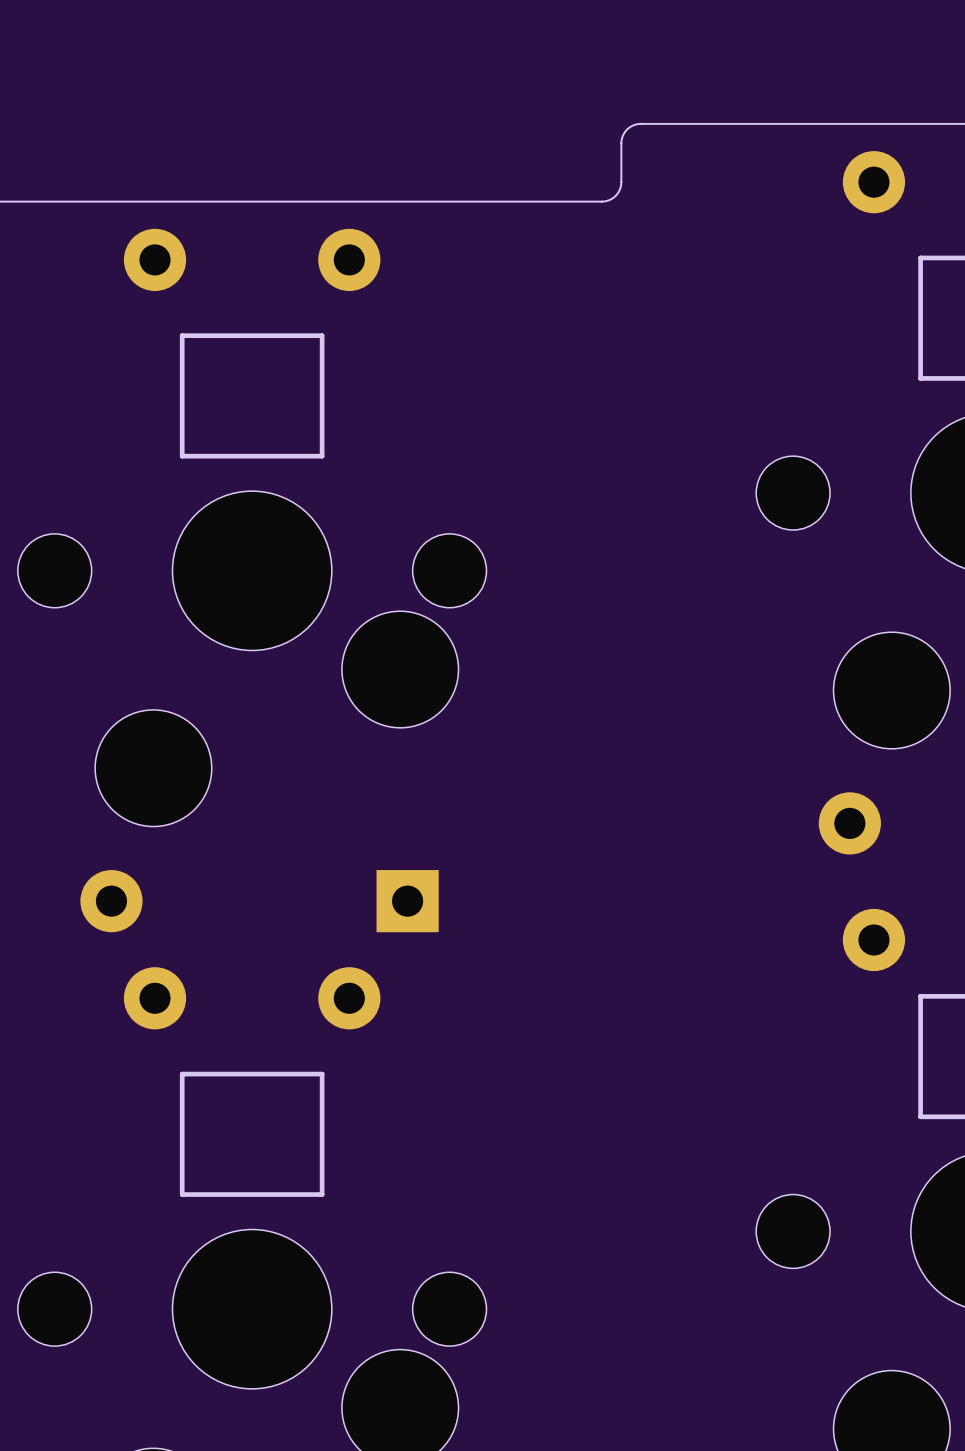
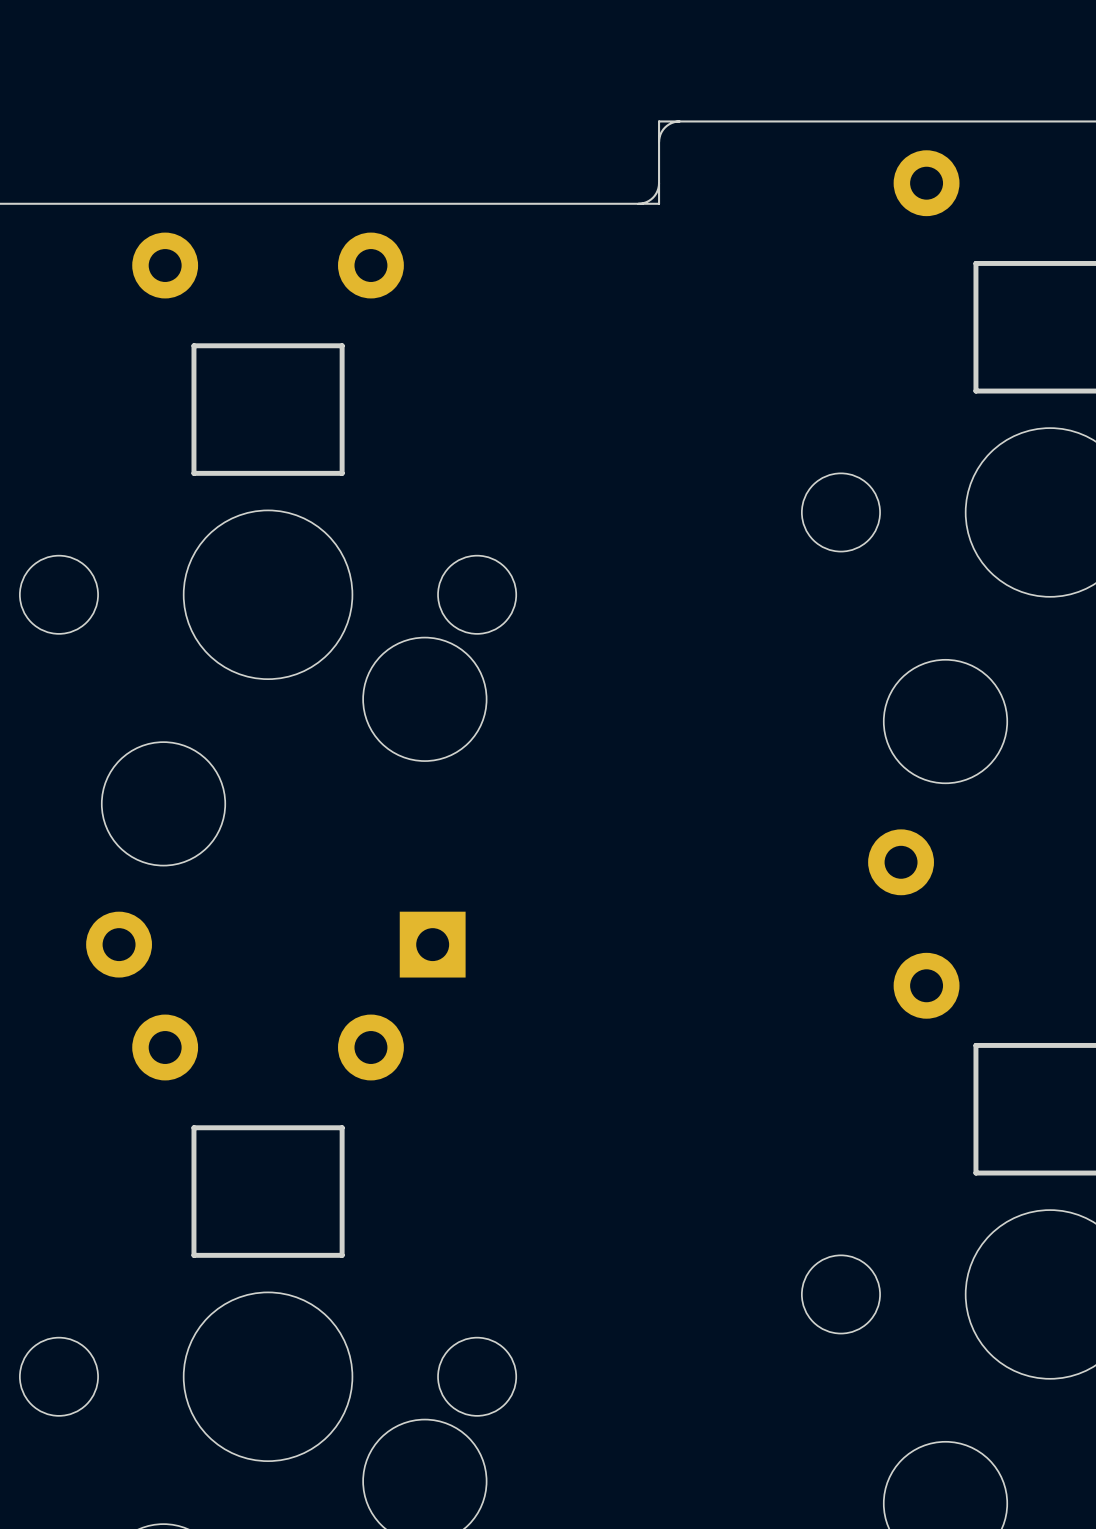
board edge: none -> (679, 121) (659, 121) (659, 142)
board edge: none -> (659, 183) (659, 203) (638, 203)

